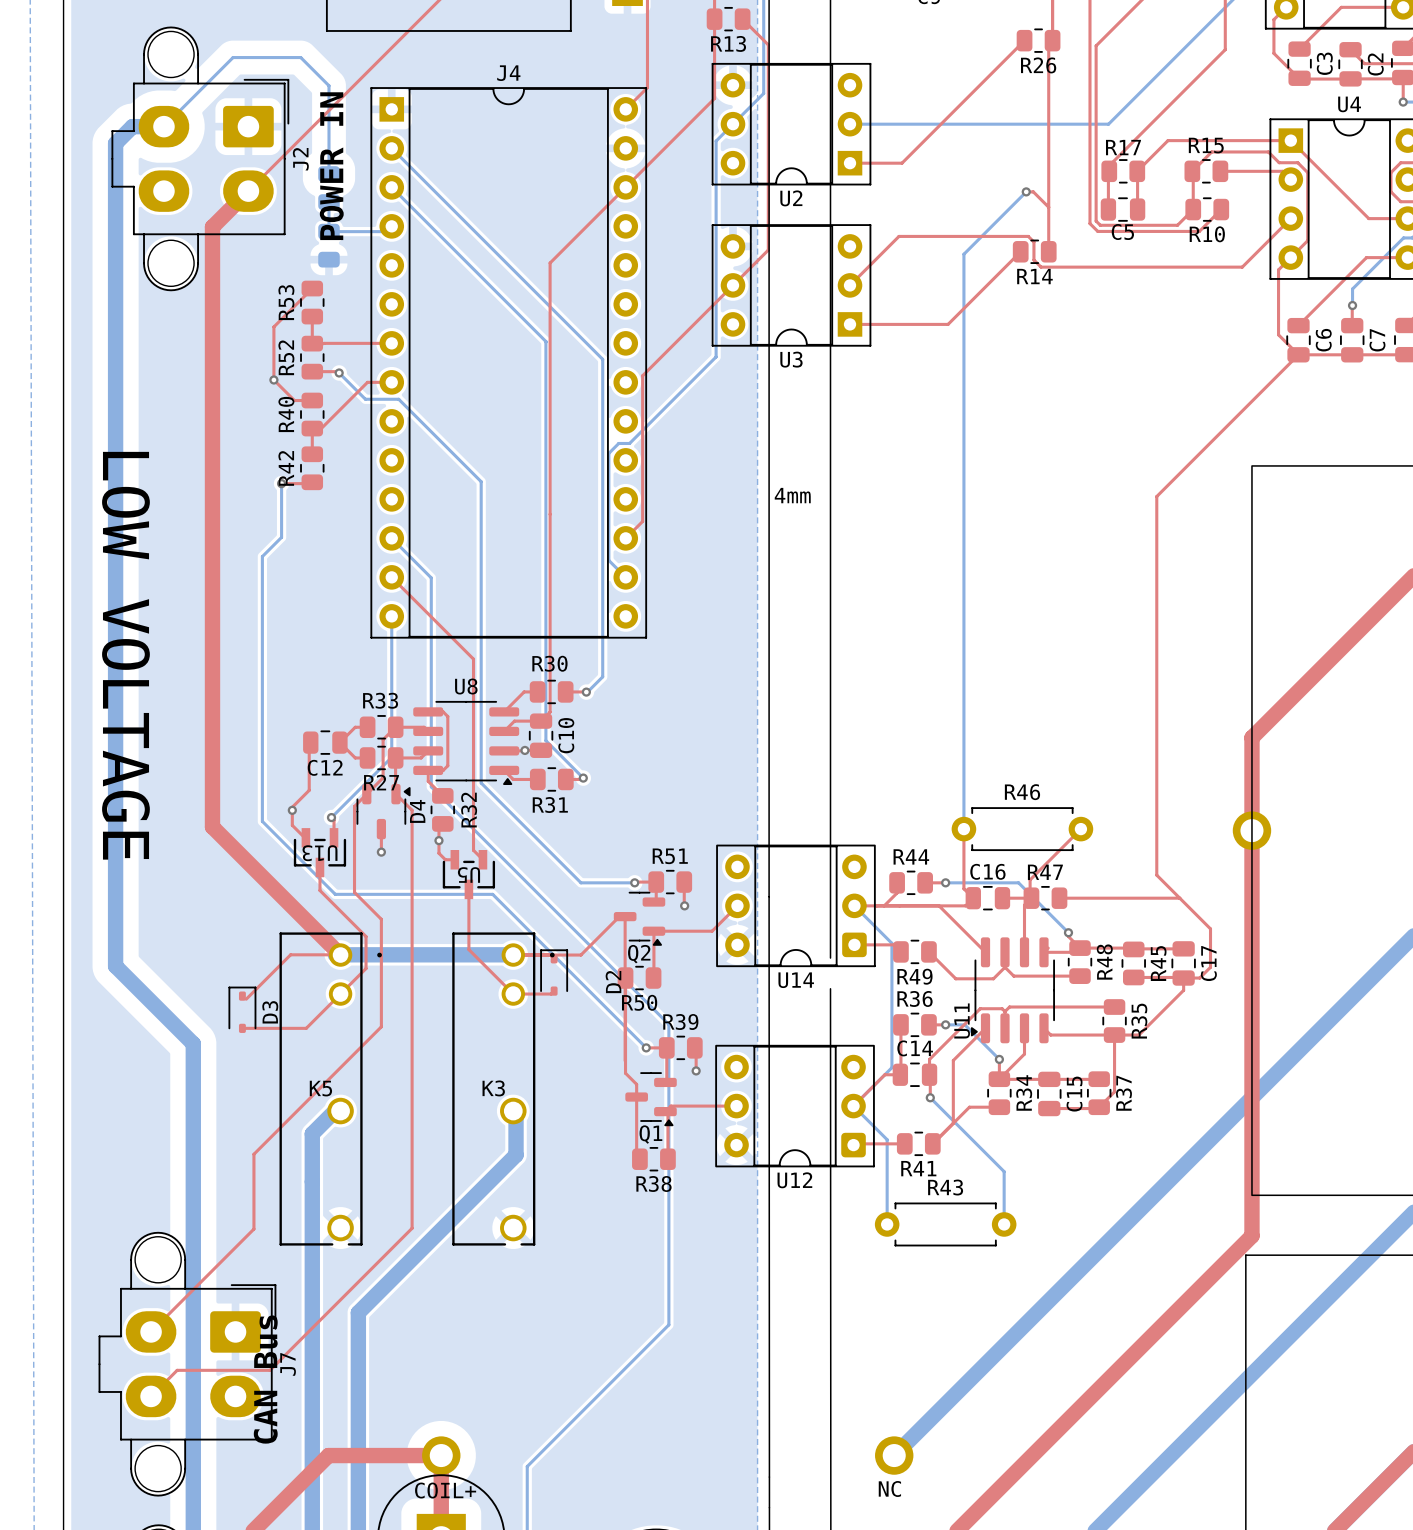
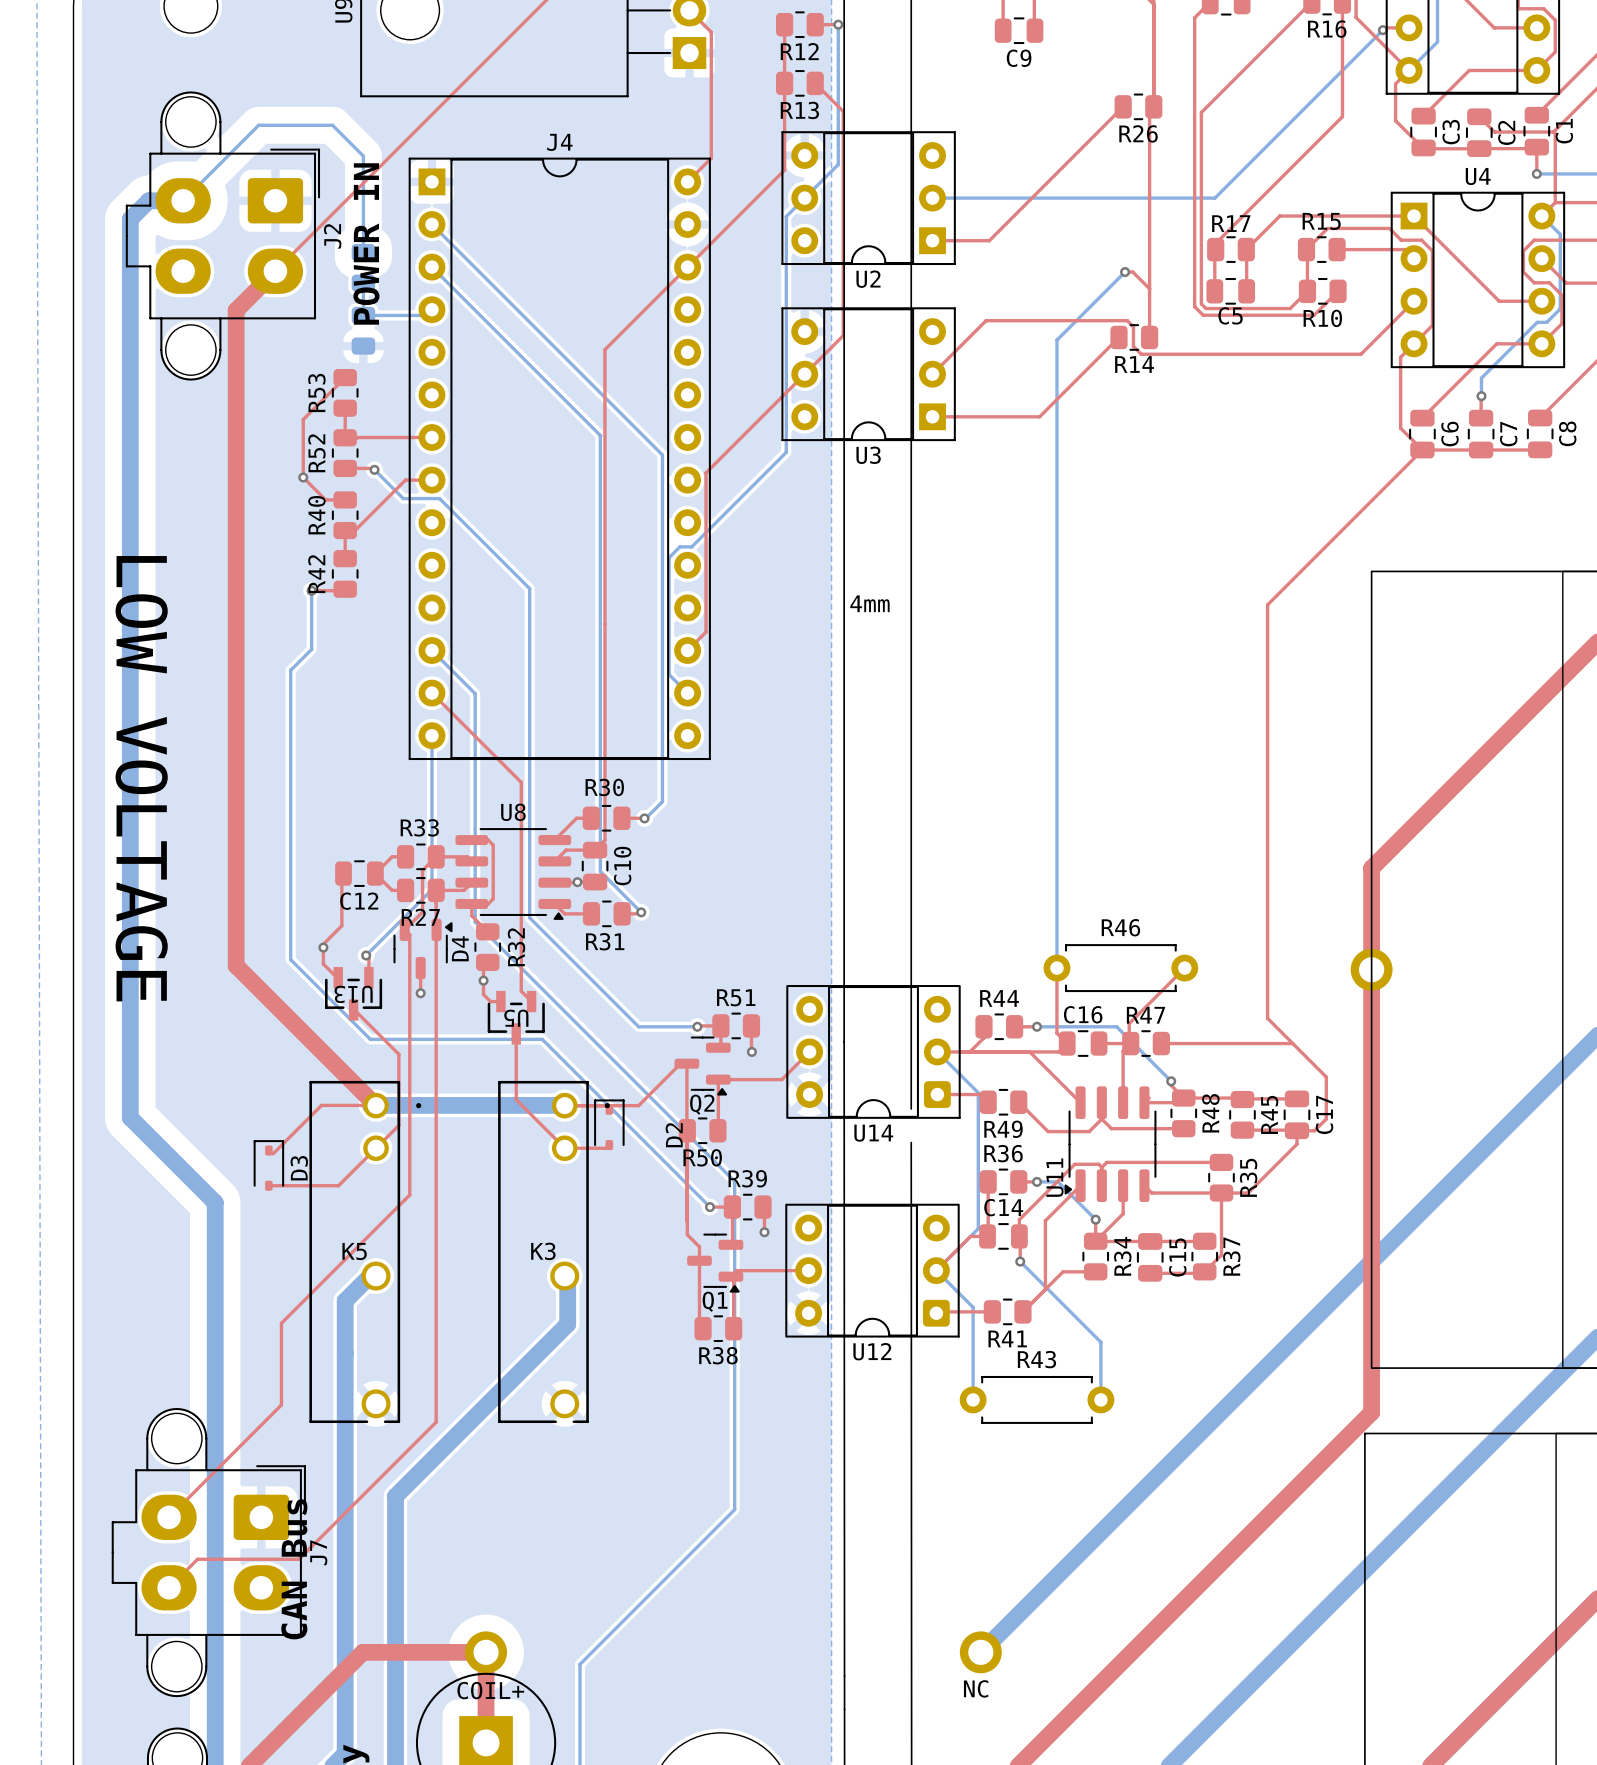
top track: (395, 793) (412, 810) (412, 1228) (395, 1244) -> (436, 929) (436, 1422)
top track: (366, 794) (354, 806) (354, 892) (381, 919) (381, 1026) (371, 1036) -> (404, 929) (409, 934) (409, 1194)
top track: (319, 867) (319, 890) (366, 936) (366, 968) (361, 973) -> (353, 1010) (398, 1054) (398, 1125)

